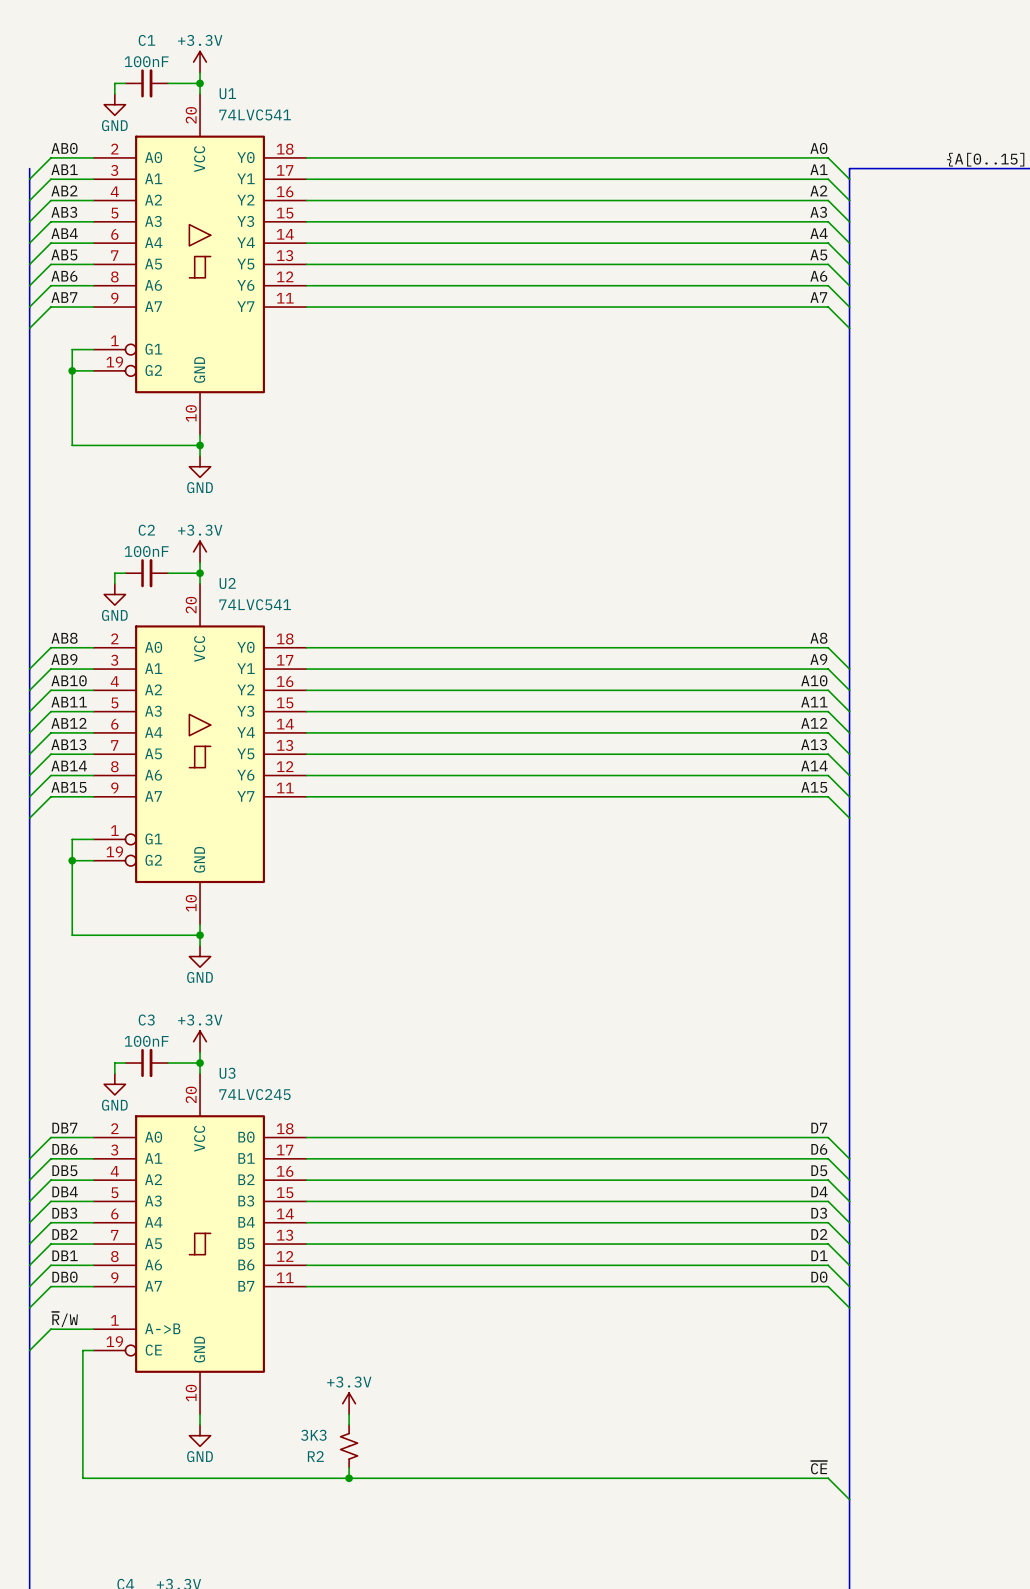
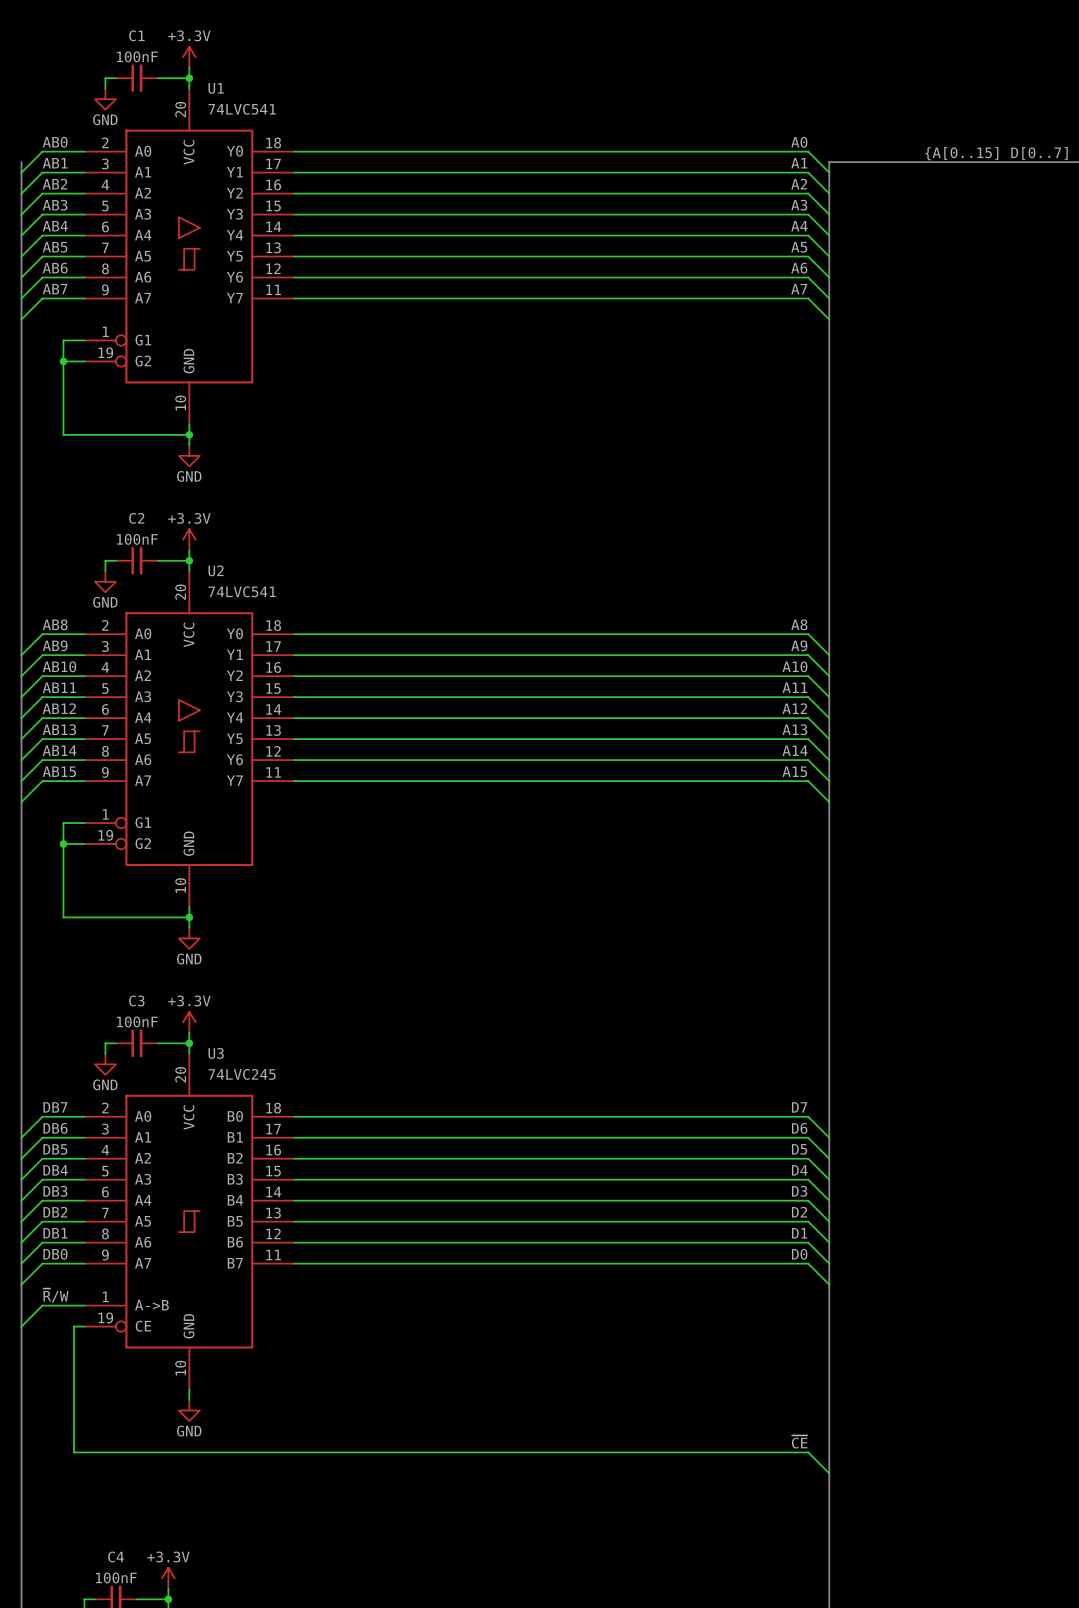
power symbol: +3.3V (349, 1403) -> none
wire: (349, 1414) (349, 1425) -> none
R2: 3K3 (349, 1446) -> none
wire: (349, 1467) (349, 1478) -> none
junction: (349, 1478) -> none

